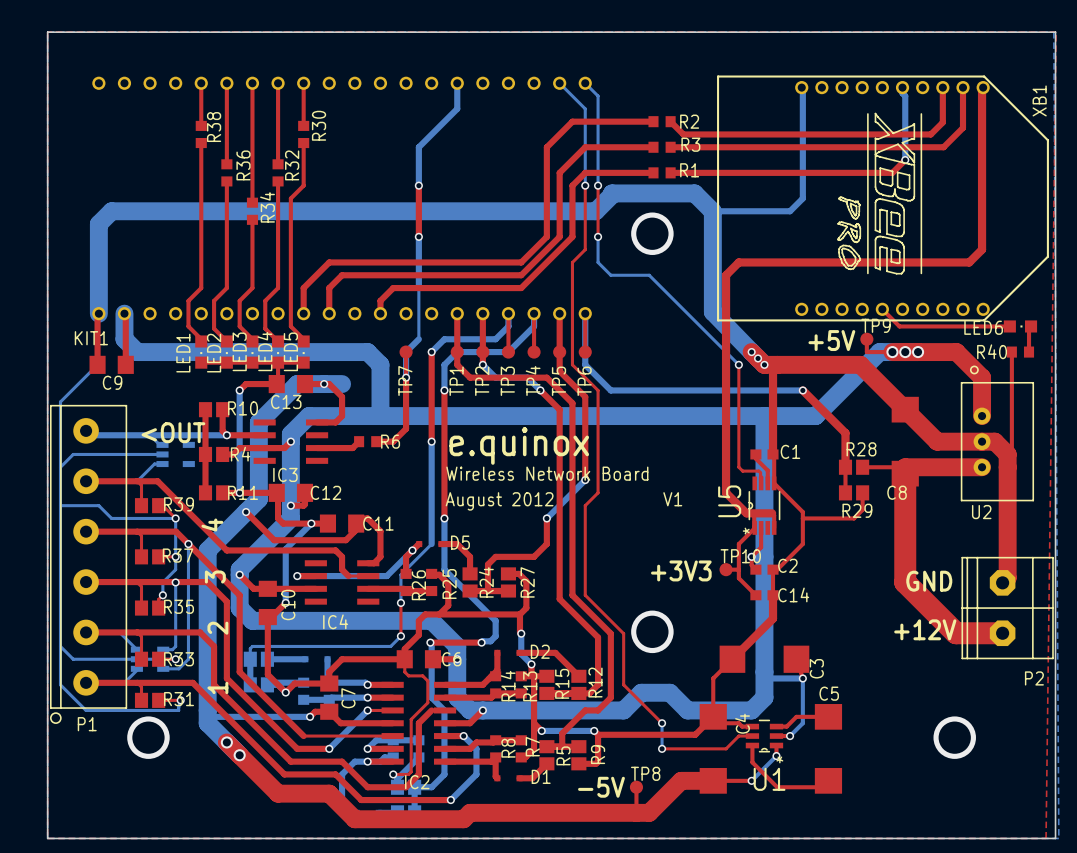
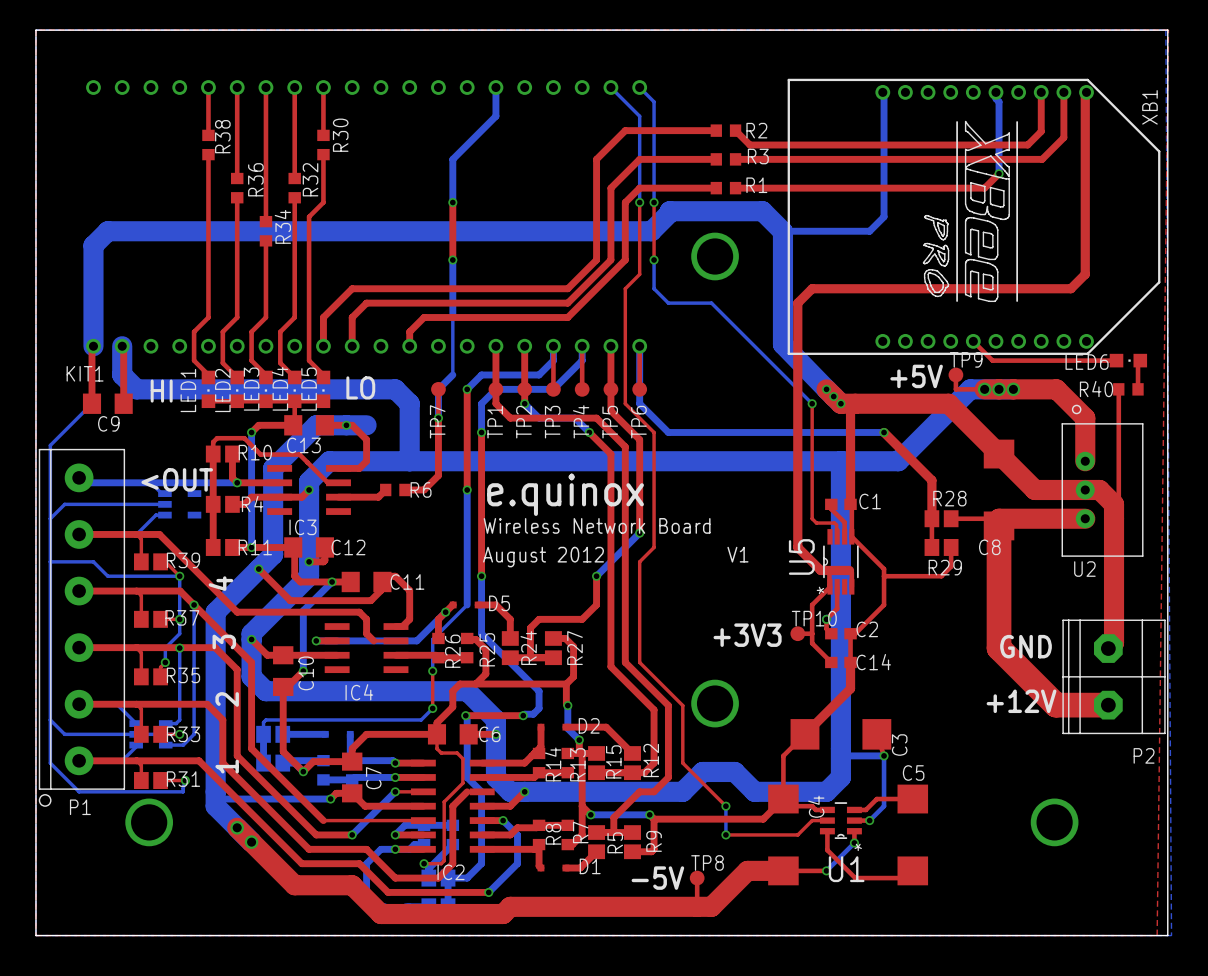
text: none -> LO (360, 387)
text: none -> HI (161, 391)
top track: none -> (213, 454) (213, 442) (217, 438) (244, 438) (260, 454) (299, 454) (327, 482) (338, 482)

